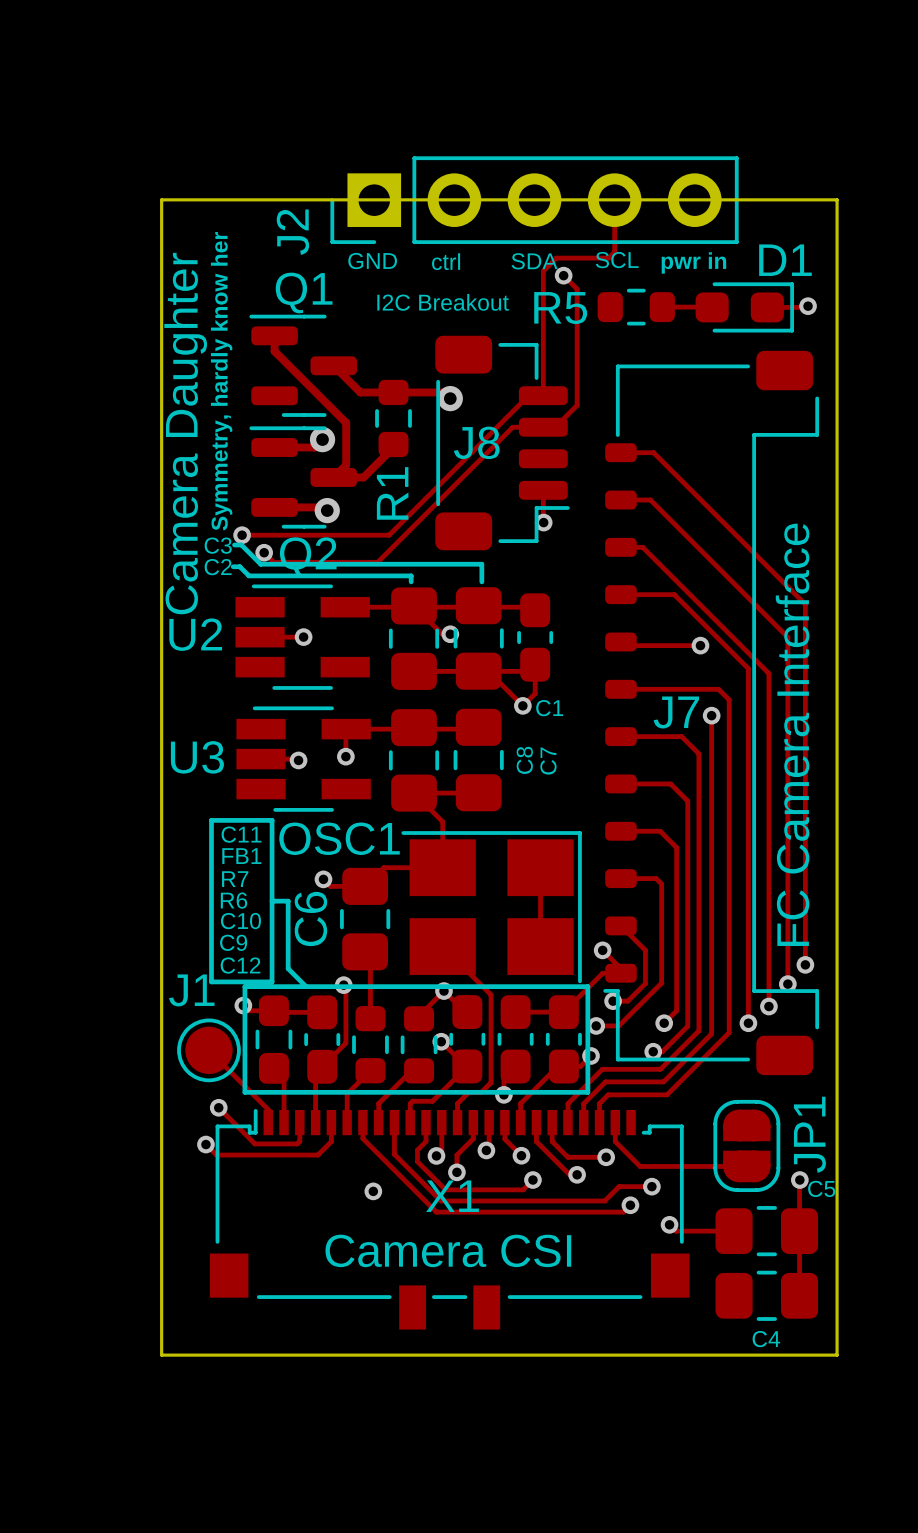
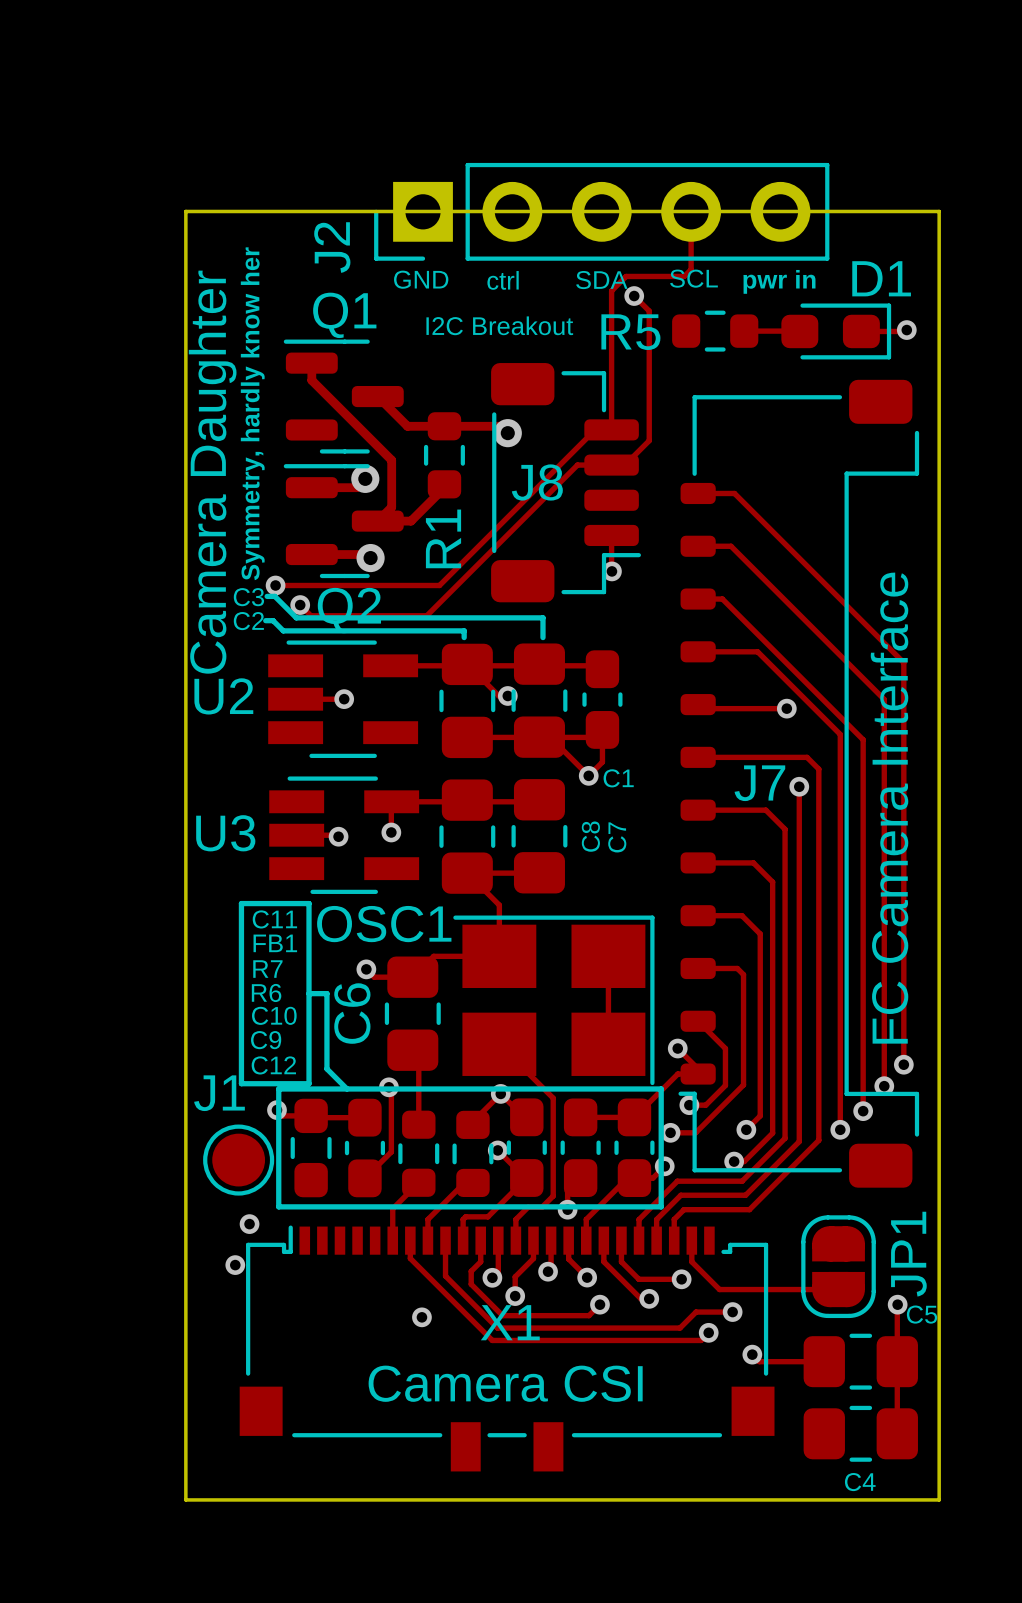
track: (208, 1050) (268, 1109) (268, 1122) -> none
track: (315, 1073) (315, 1122) -> none
track: (284, 1078) (284, 1122) -> none
track: (218, 1107) (254, 1143) (297, 1143) (299, 1141) (299, 1122) -> none
track: (331, 1122) (331, 1141) (317, 1155) (216, 1155) (205, 1144) -> none

